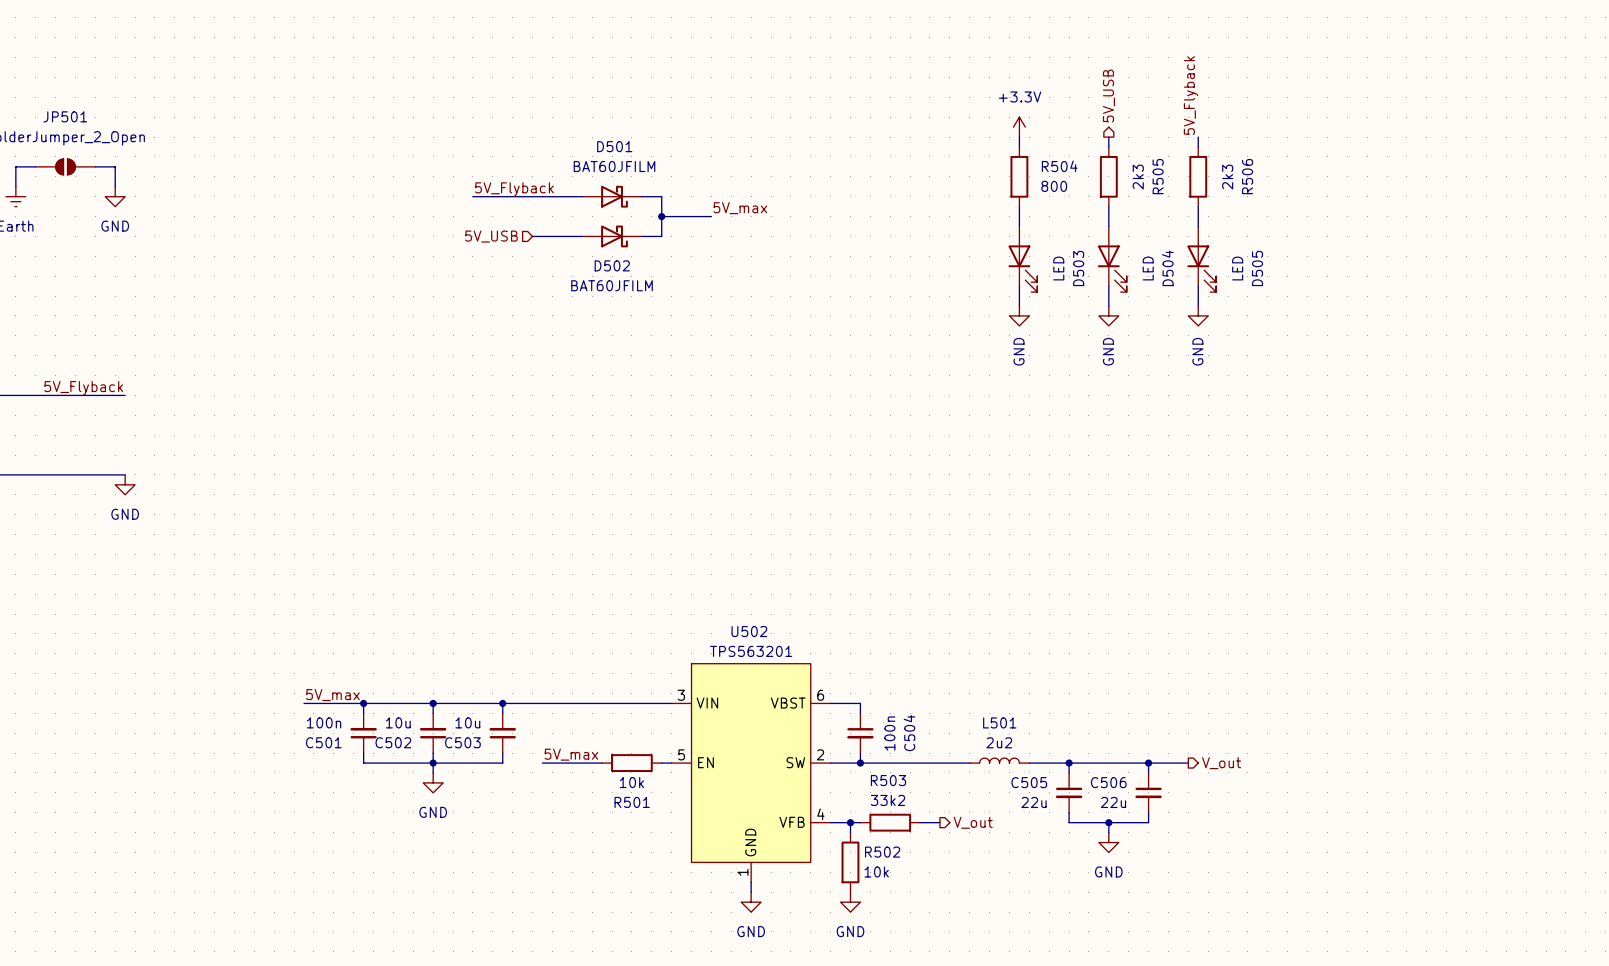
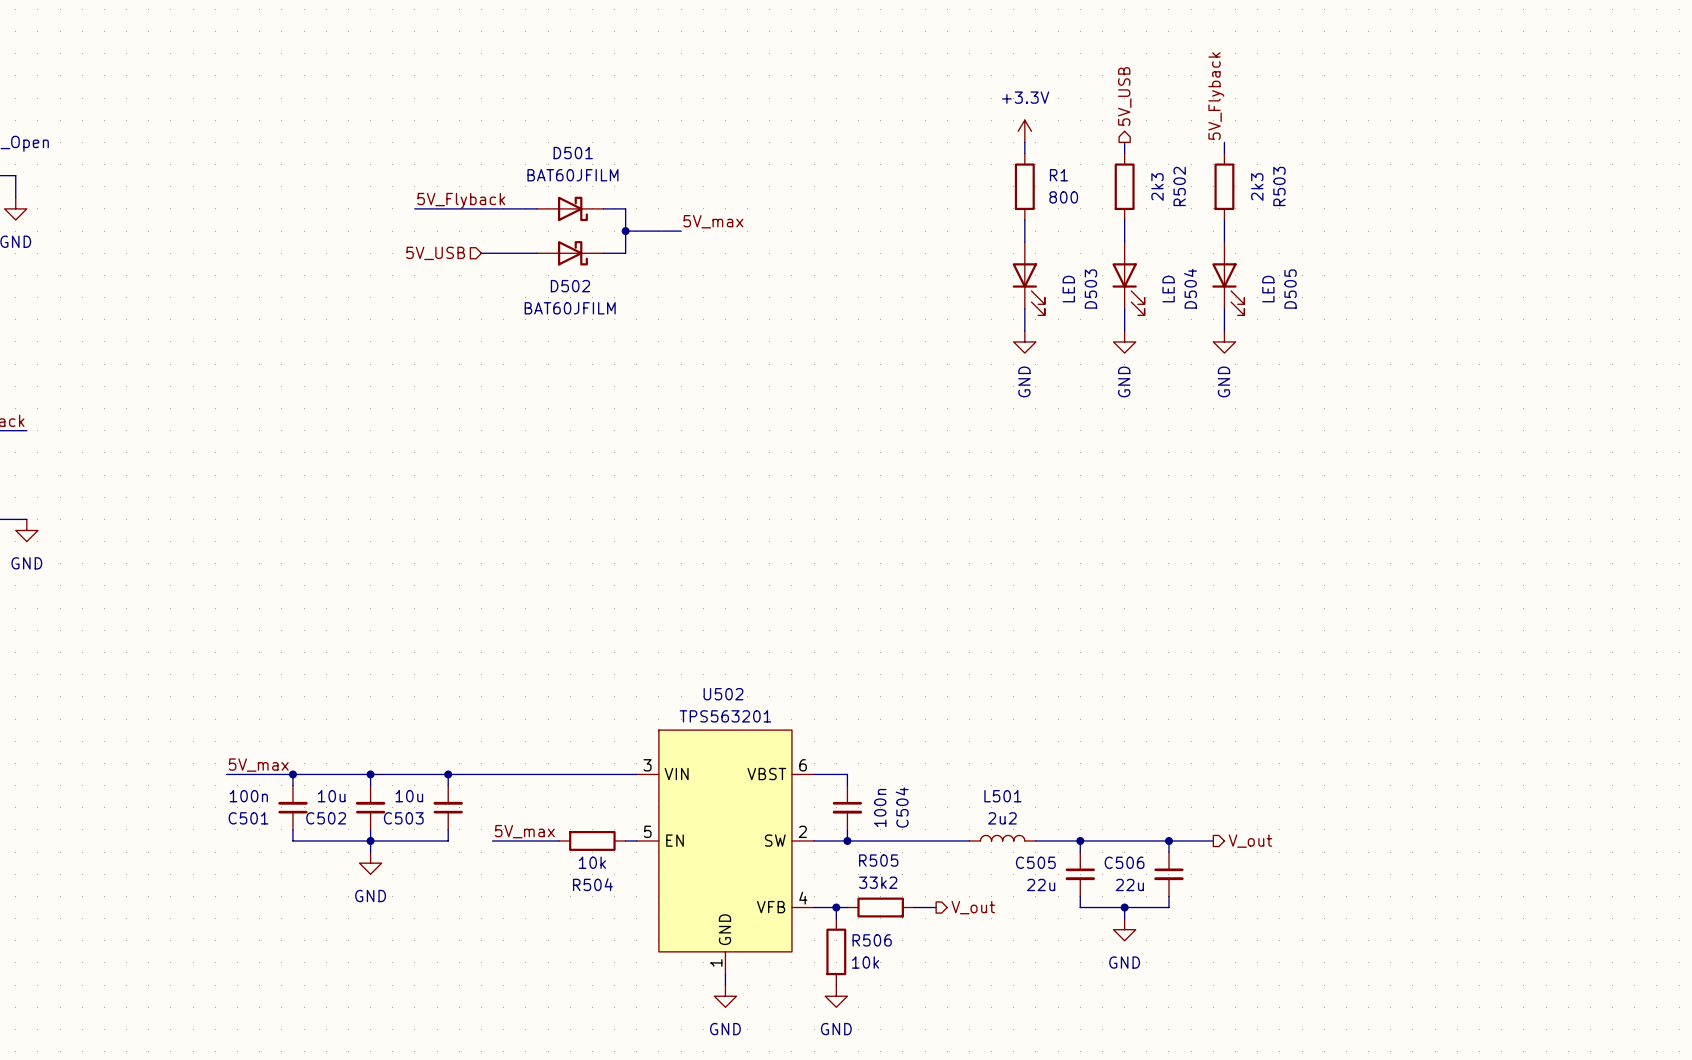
R504 name: R504 (1059, 166) -> R1 (1058, 175)
R505 name: R505 (1158, 176) -> R502 (1179, 186)
R506 name: R506 (1247, 176) -> R503 (1279, 186)
R503 name: R503 (888, 780) -> R505 (878, 860)
R501 name: R501 (632, 802) -> R504 (592, 884)
R502 name: R502 (882, 852) -> R506 (872, 940)

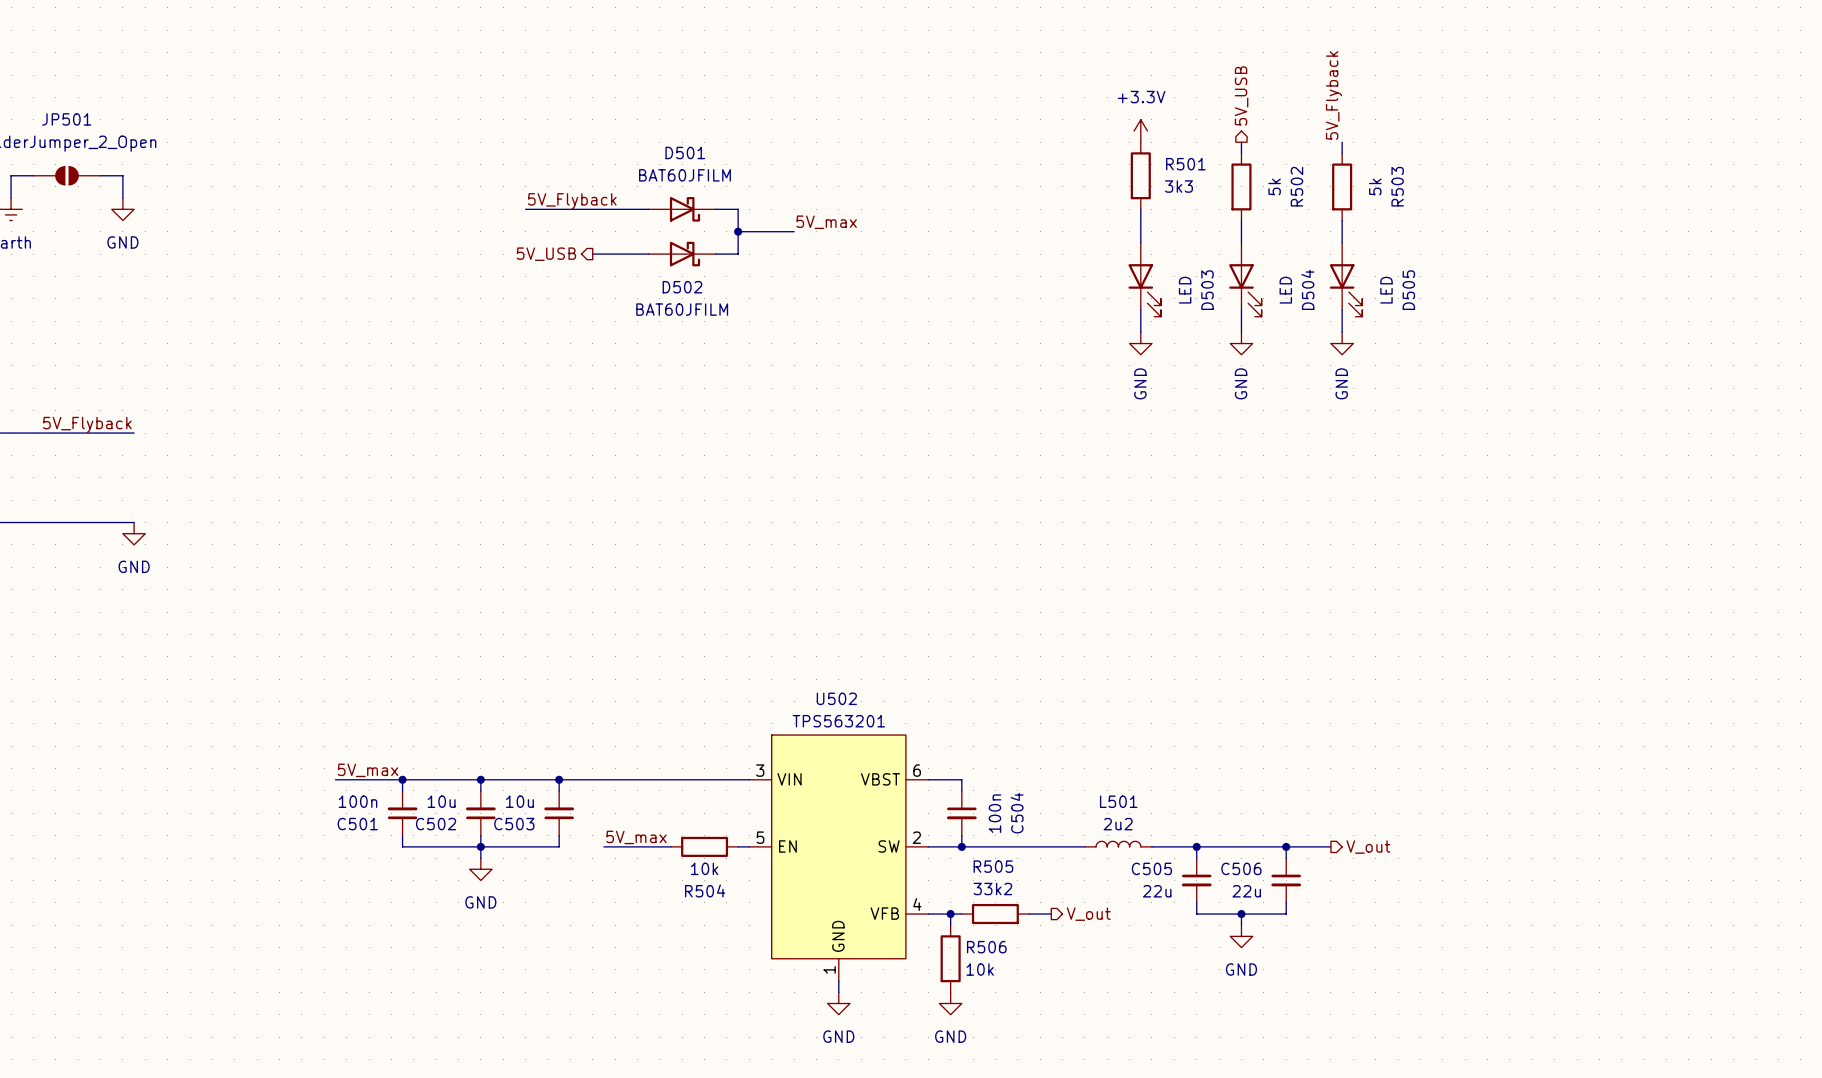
R501: none -> 3k3 (1140, 175)
R1: 800 (1024, 186) -> none
R502 value: 2k3 (1157, 187) -> 5k (1274, 186)
R503 value: 2k3 (1257, 187) -> 5k (1375, 186)
hierarchical label shape: input (435, 253) -> output (546, 254)

